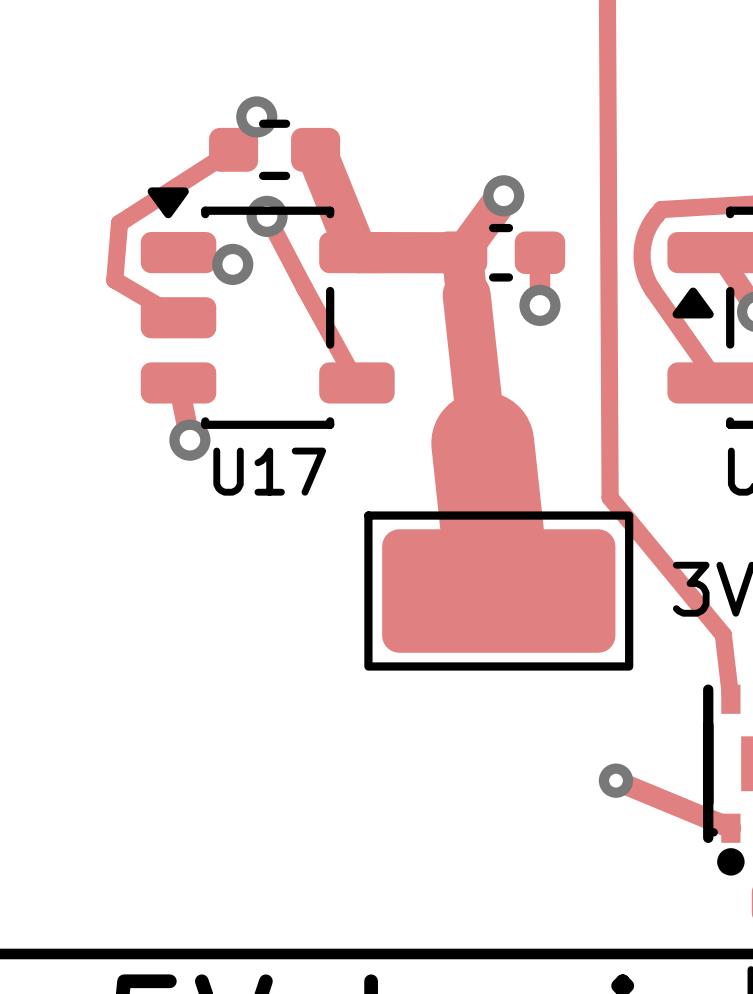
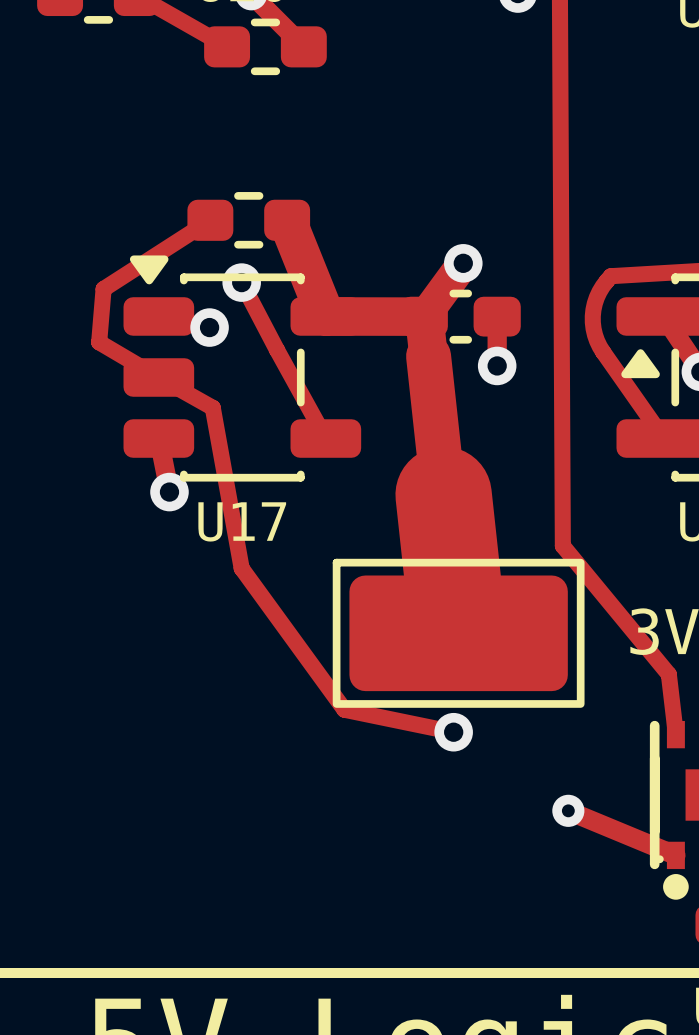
via: (256, 116) -> none
track: none -> (158, 377) (212, 407) (241, 568) (344, 709) (453, 732)
via: none -> (453, 732)

